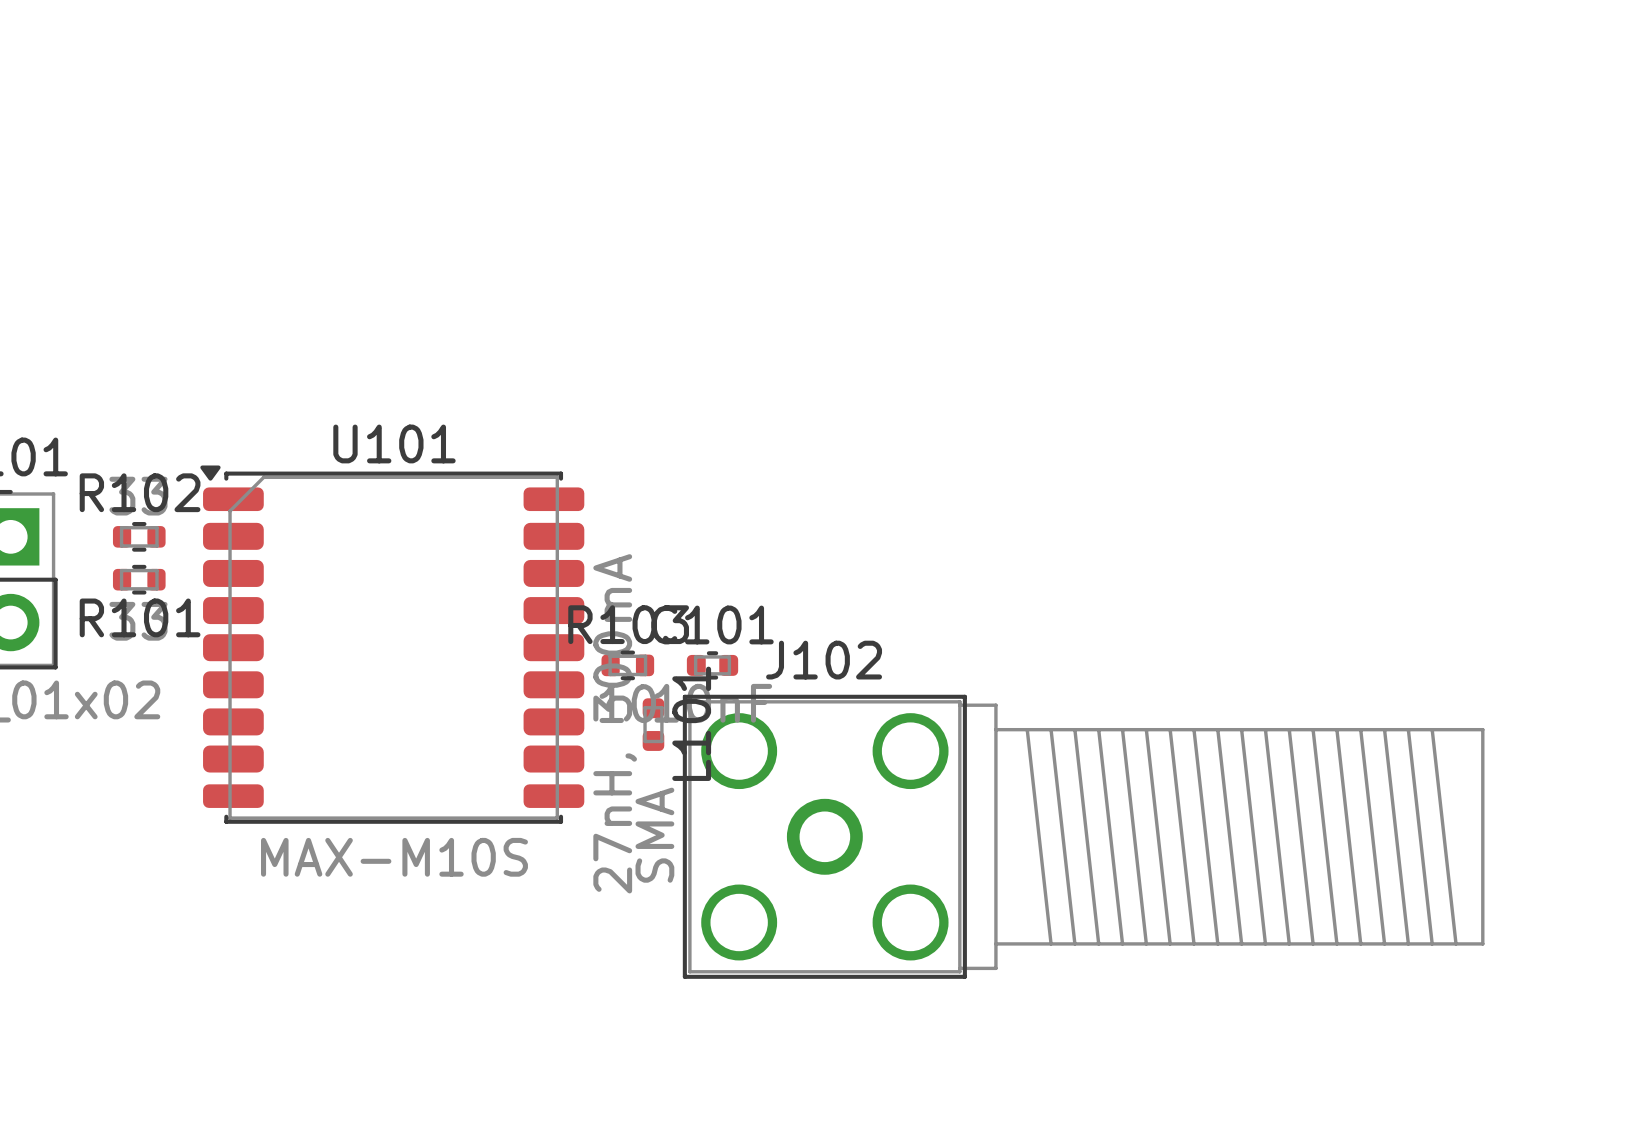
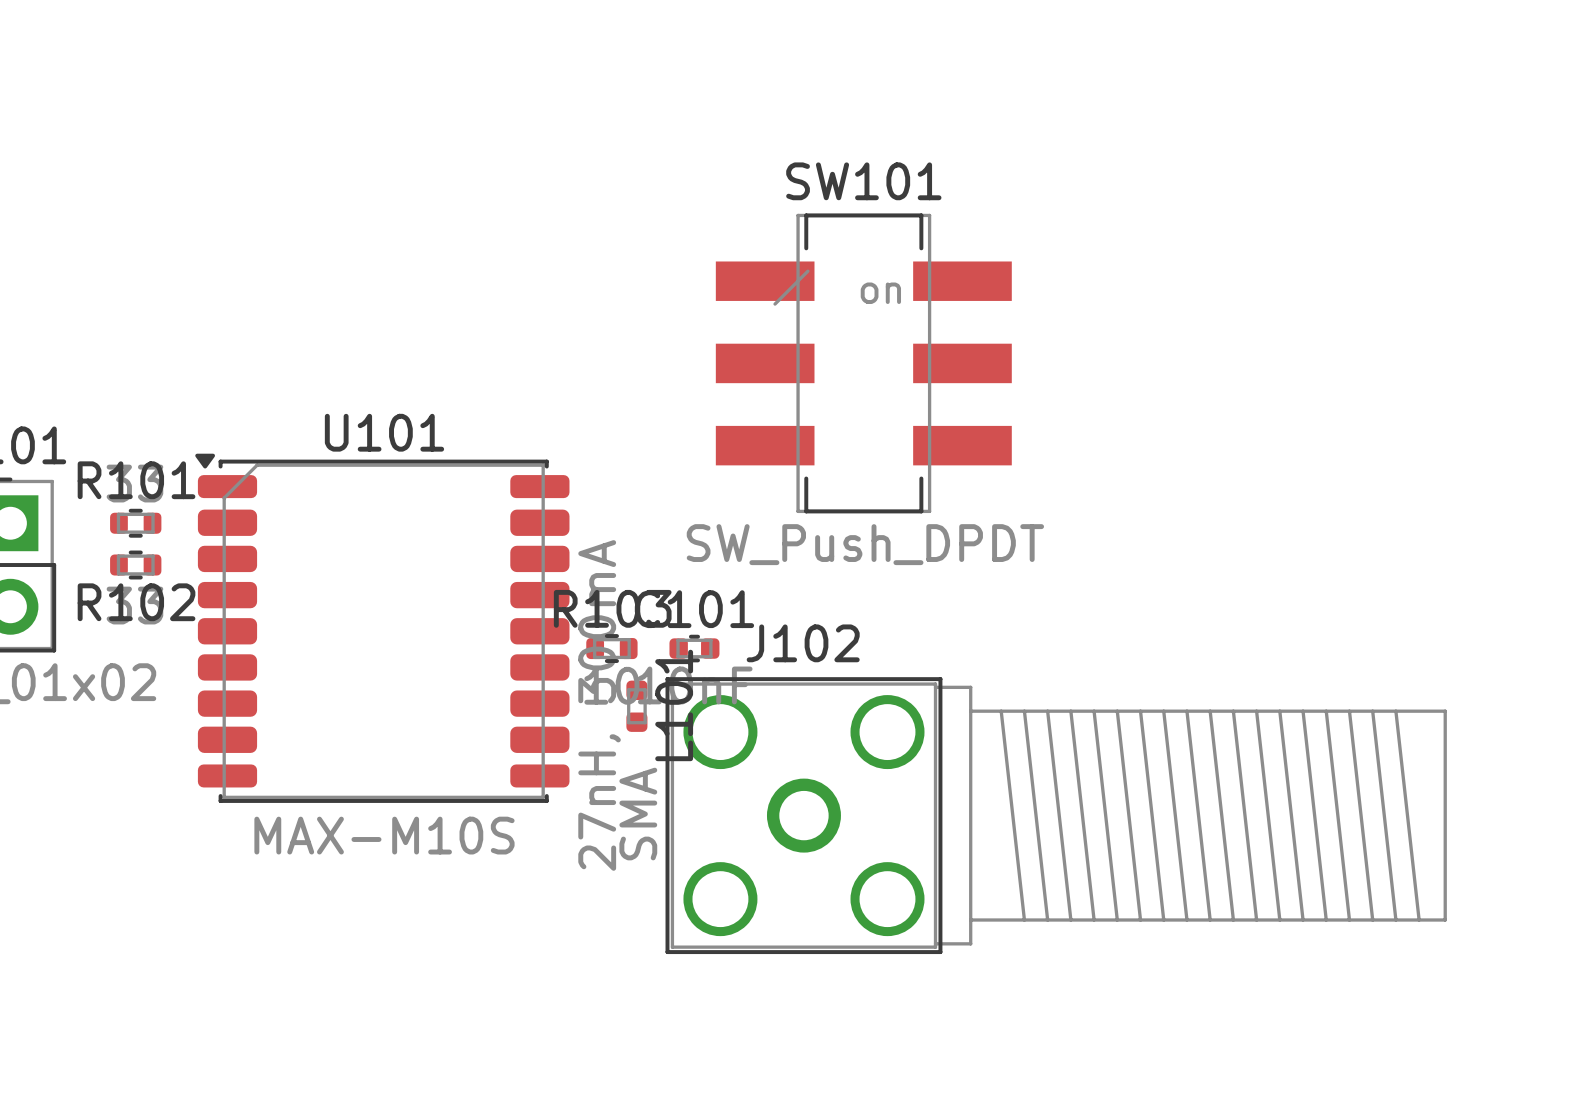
SW101: none -> SW_Push_DPDT (863, 363)
R102 name: R102 (140, 492) -> R101 (136, 480)
R101 name: R101 (140, 617) -> R102 (136, 602)

